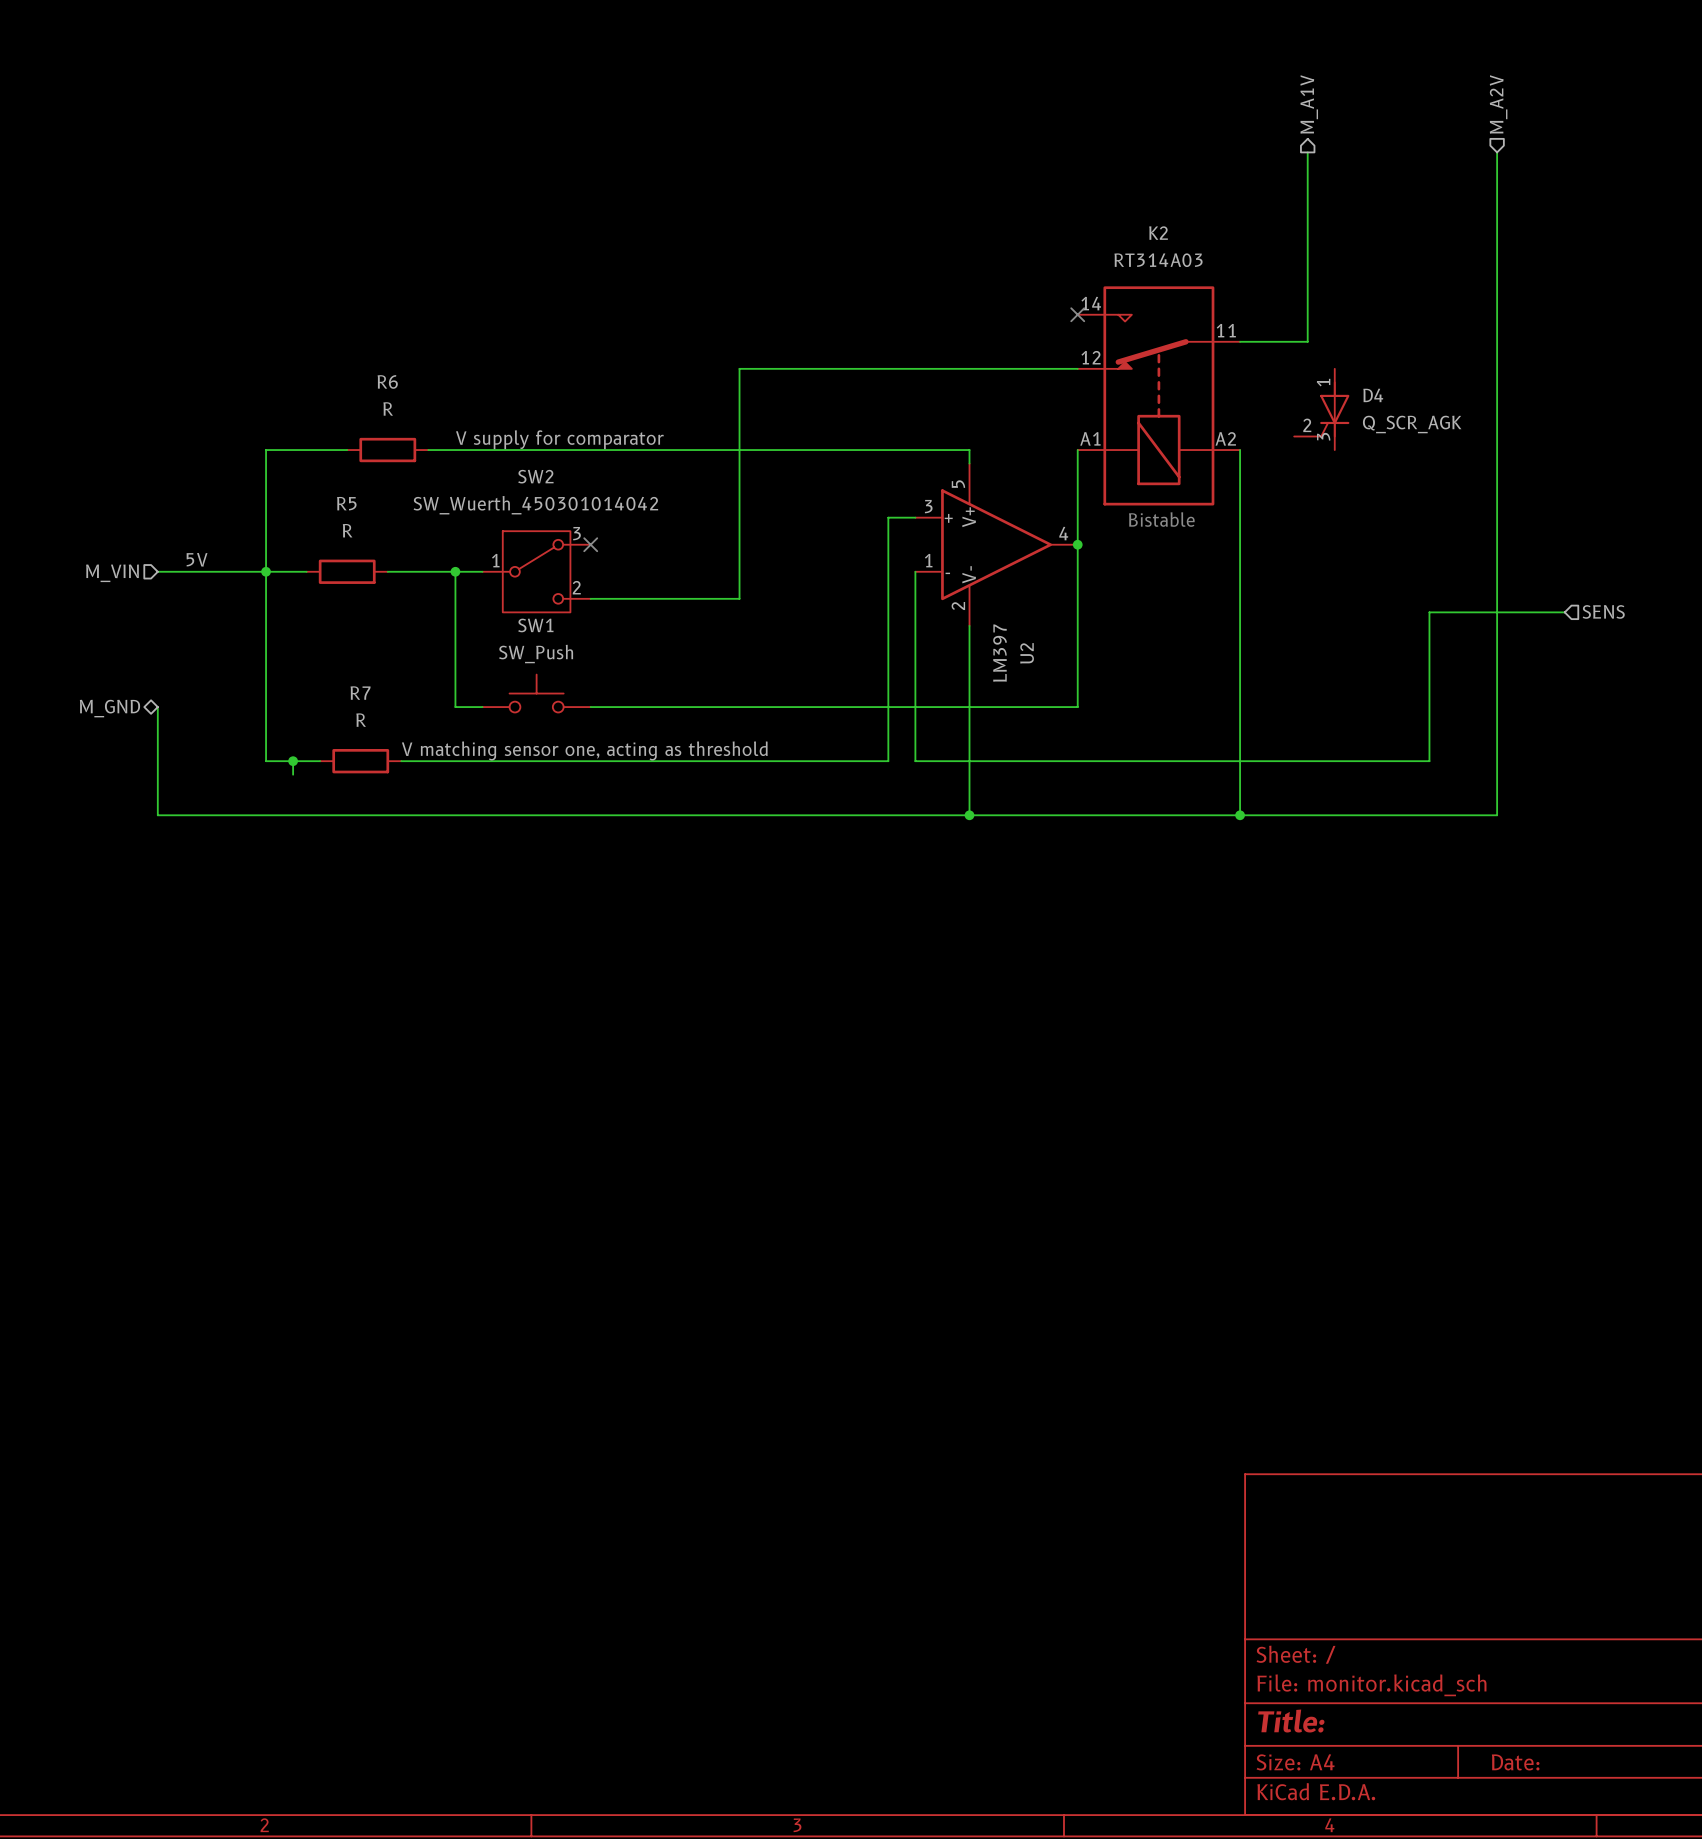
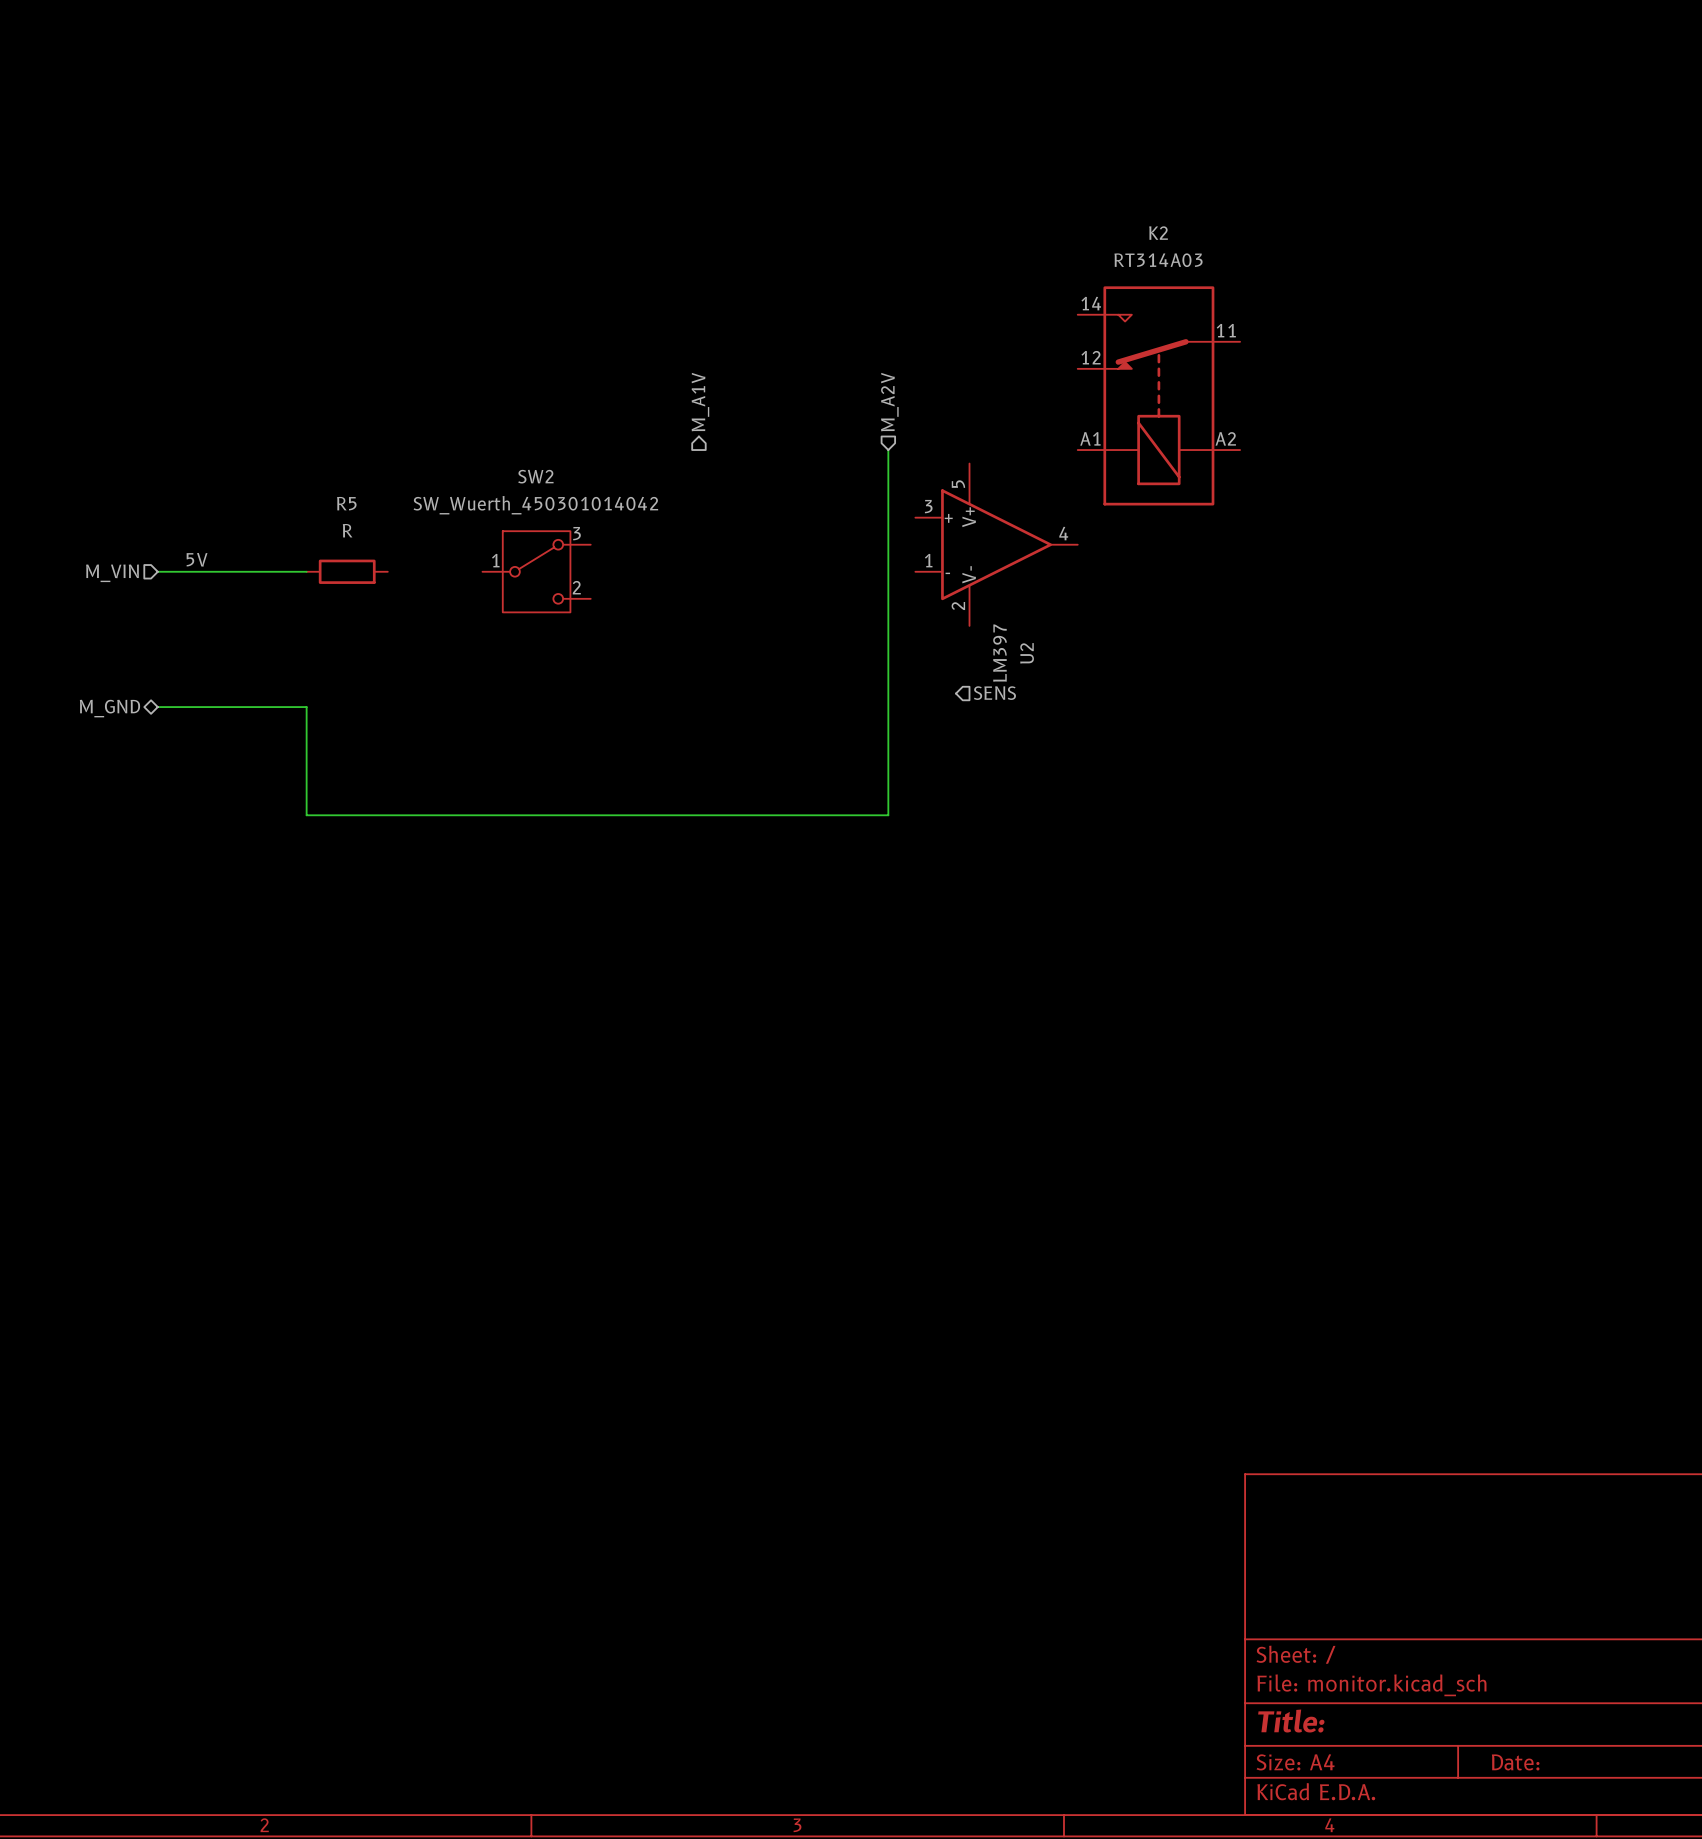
hierarchical label: M_A1V (1309, 104) -> none
hierarchical label: M_A2V (1498, 104) -> none
wire: (1307, 152) (1307, 341) (1240, 341) -> none
wire: (1497, 152) (1497, 815) (888, 815) -> none
no-connect mark: (1077, 314) -> none
wire: (1077, 368) (739, 368) (739, 598) (590, 598) -> none
hierarchical label: none -> M_A1V (700, 402)
hierarchical label: none -> M_A2V (889, 402)
D4: Q_SCR_AGK (1321, 409) -> none
label: V supply for comparator (559, 439) -> none
wire: (347, 450) (266, 450) (266, 761) (320, 761) -> none
R6: R (387, 450) -> none
wire: (428, 450) (969, 450) (969, 463) -> none
wire: (1077, 450) (1077, 707) (590, 707) -> none
wire: (1240, 450) (1240, 815) -> none
wire: (888, 517) (915, 517) -> (888, 517) (888, 450)
text: Bistable (1161, 519) -> none
no-connect mark: (590, 544) -> none
junction: (1077, 544) -> none
junction: (266, 571) -> none
wire: (387, 571) (482, 571) -> none
wire: (455, 571) (455, 707) (482, 707) -> none
junction: (455, 571) -> none
wire: (915, 571) (915, 761) (1429, 761) (1429, 612) (1564, 612) -> none
hierarchical label: SENS (1603, 611) -> none
wire: (969, 625) (969, 815) -> none
SW1: SW_Push (536, 693) -> none
hierarchical label: none -> SENS (994, 693)
wire: (157, 707) (157, 815) (306, 815) -> (157, 707) (306, 707) (306, 815)
label: V matching sensor one, acting as threshold (584, 750) -> none
wire: (293, 761) (293, 774) -> none
junction: (293, 761) -> none
R7: R (360, 761) -> none
wire: (401, 761) (888, 761) -> (888, 815) (888, 761)
junction: (969, 815) -> none
junction: (1240, 815) -> none

